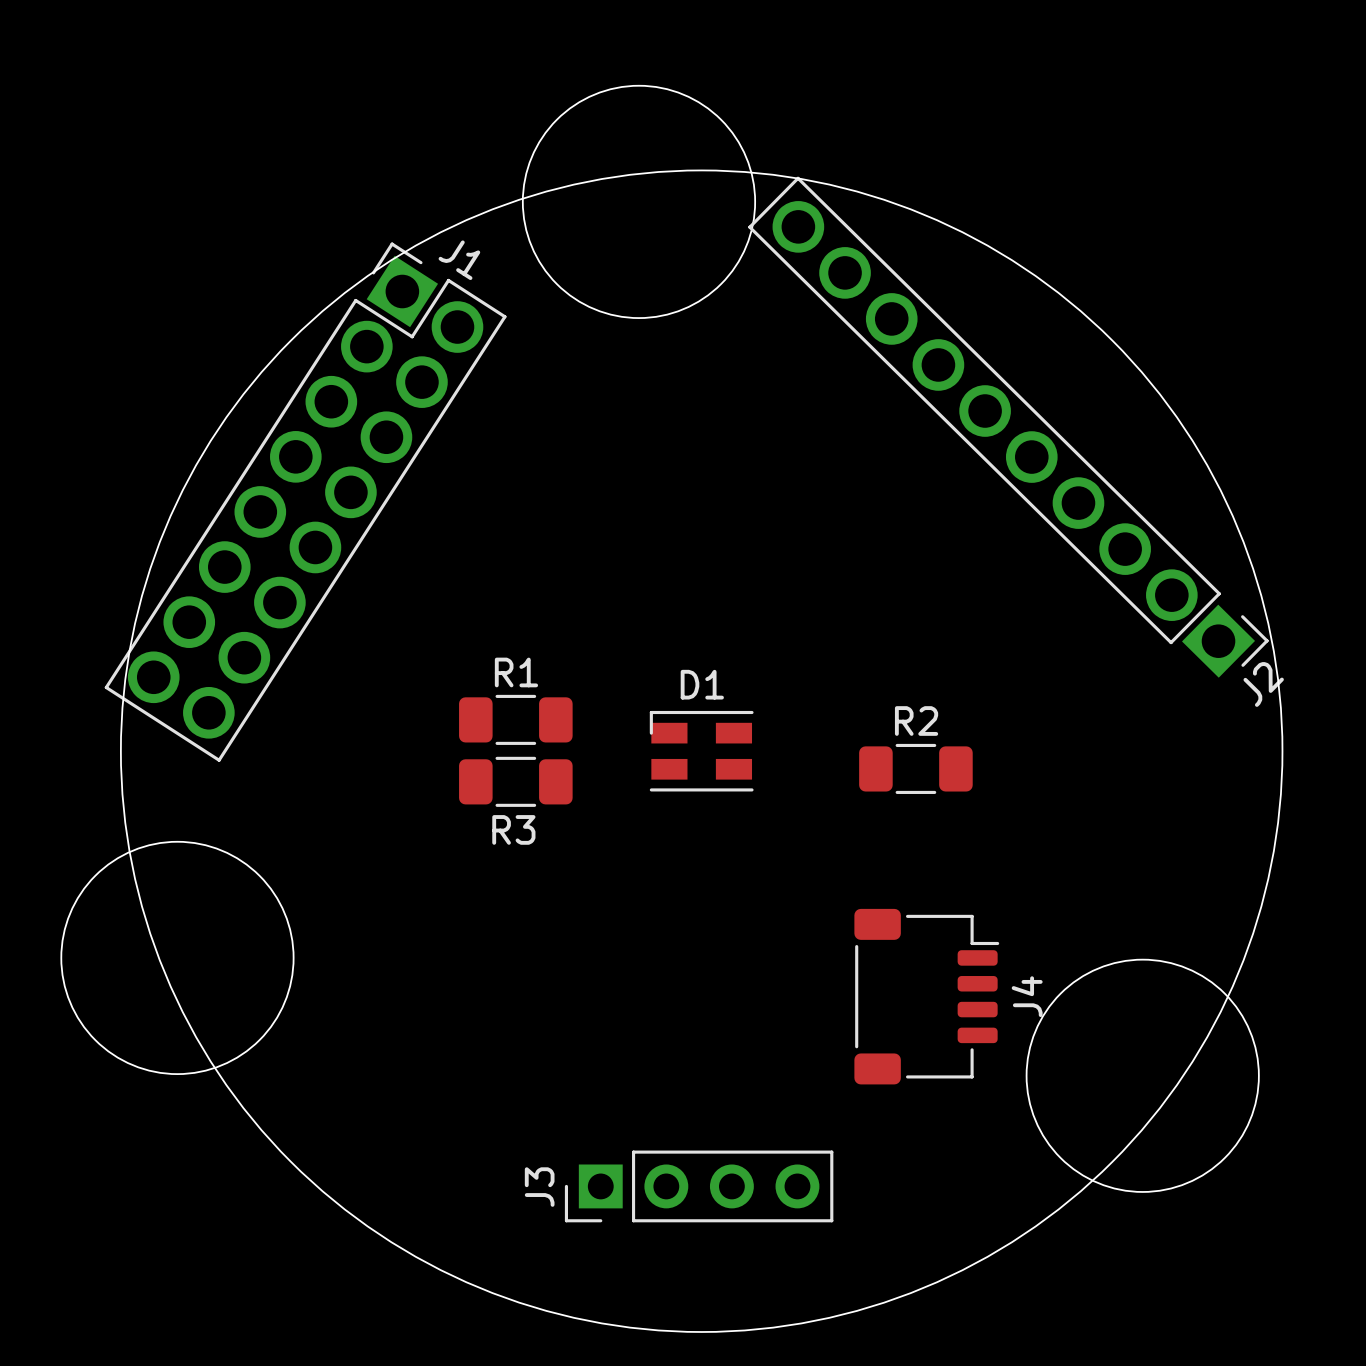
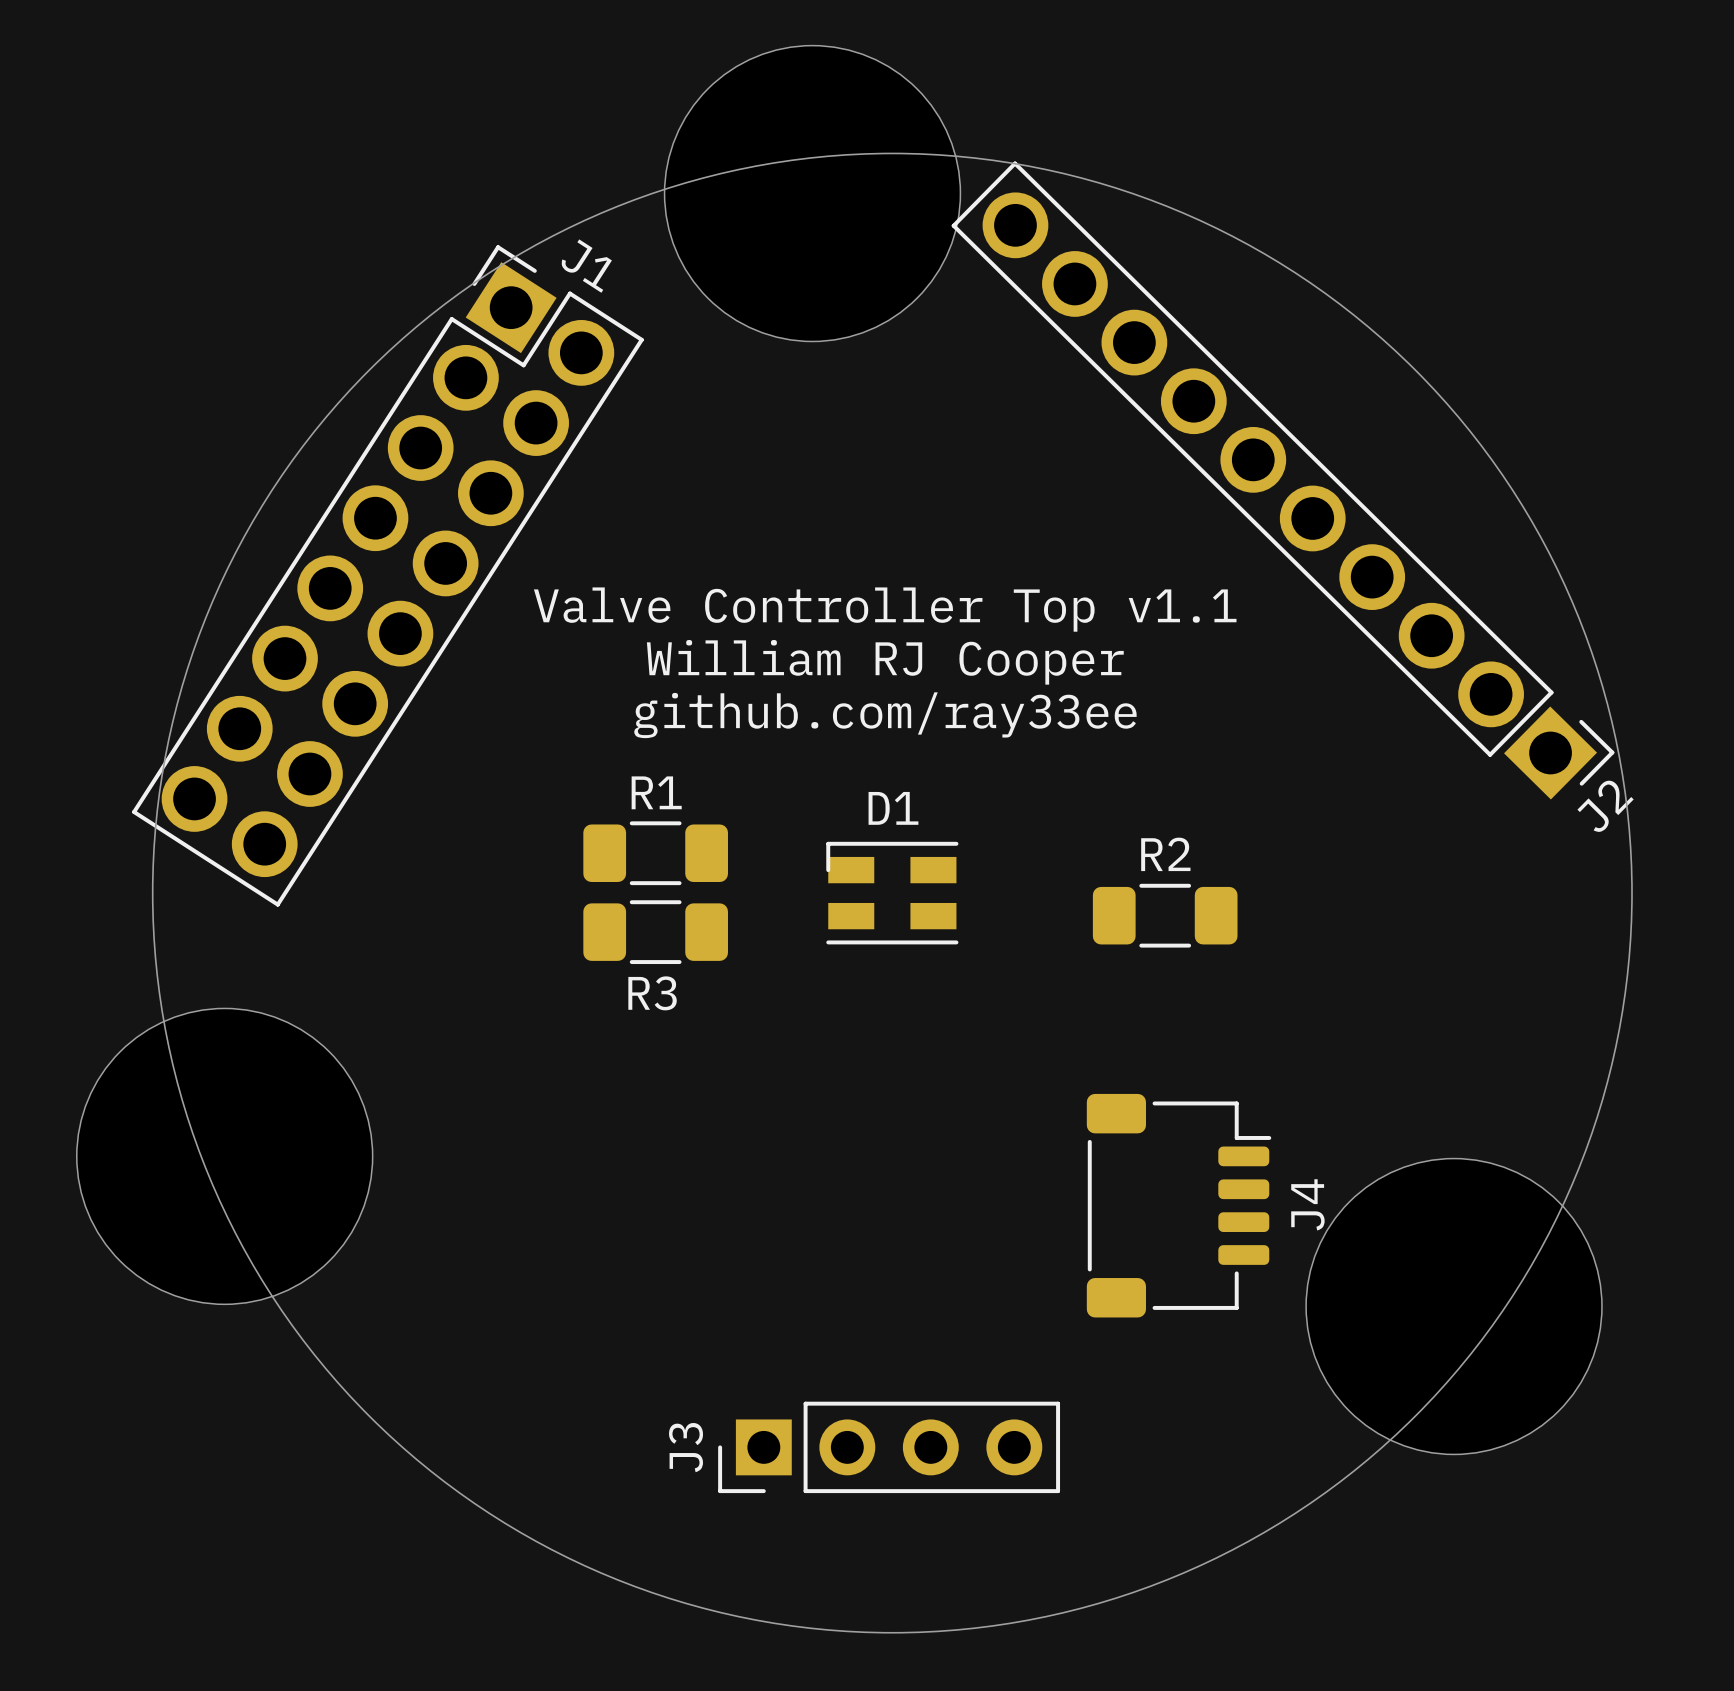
text: none -> Valve Controller Top v1.1 (885, 609)
text: none -> William RJ Cooper (885, 662)
text: none -> github.com/ray33ee (885, 715)

